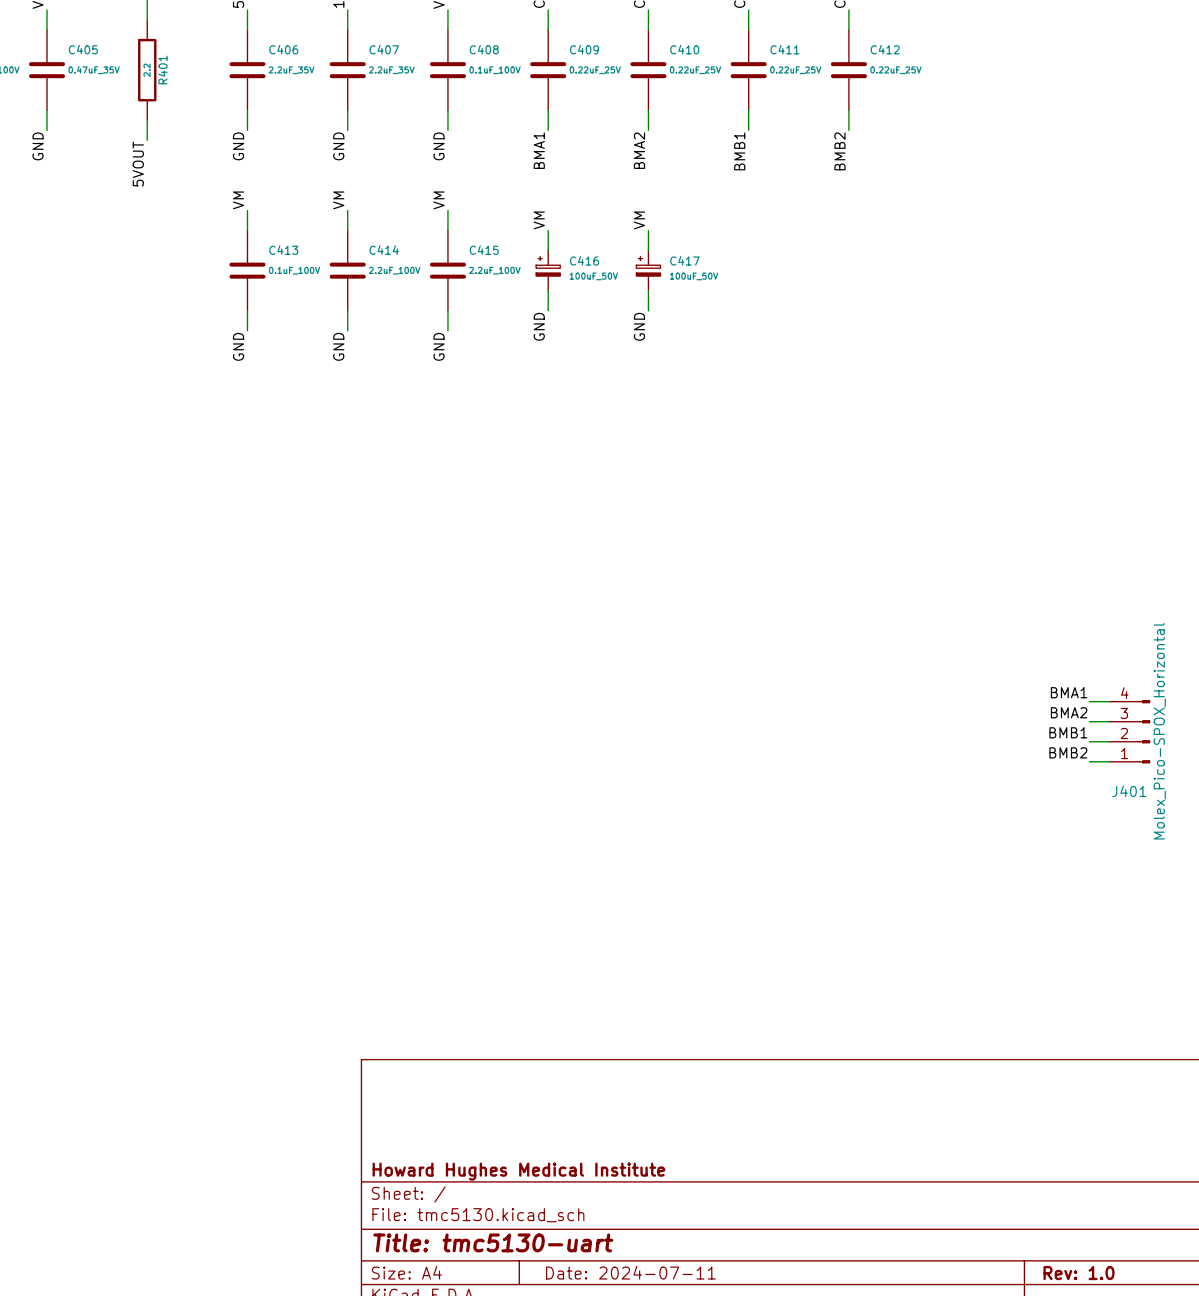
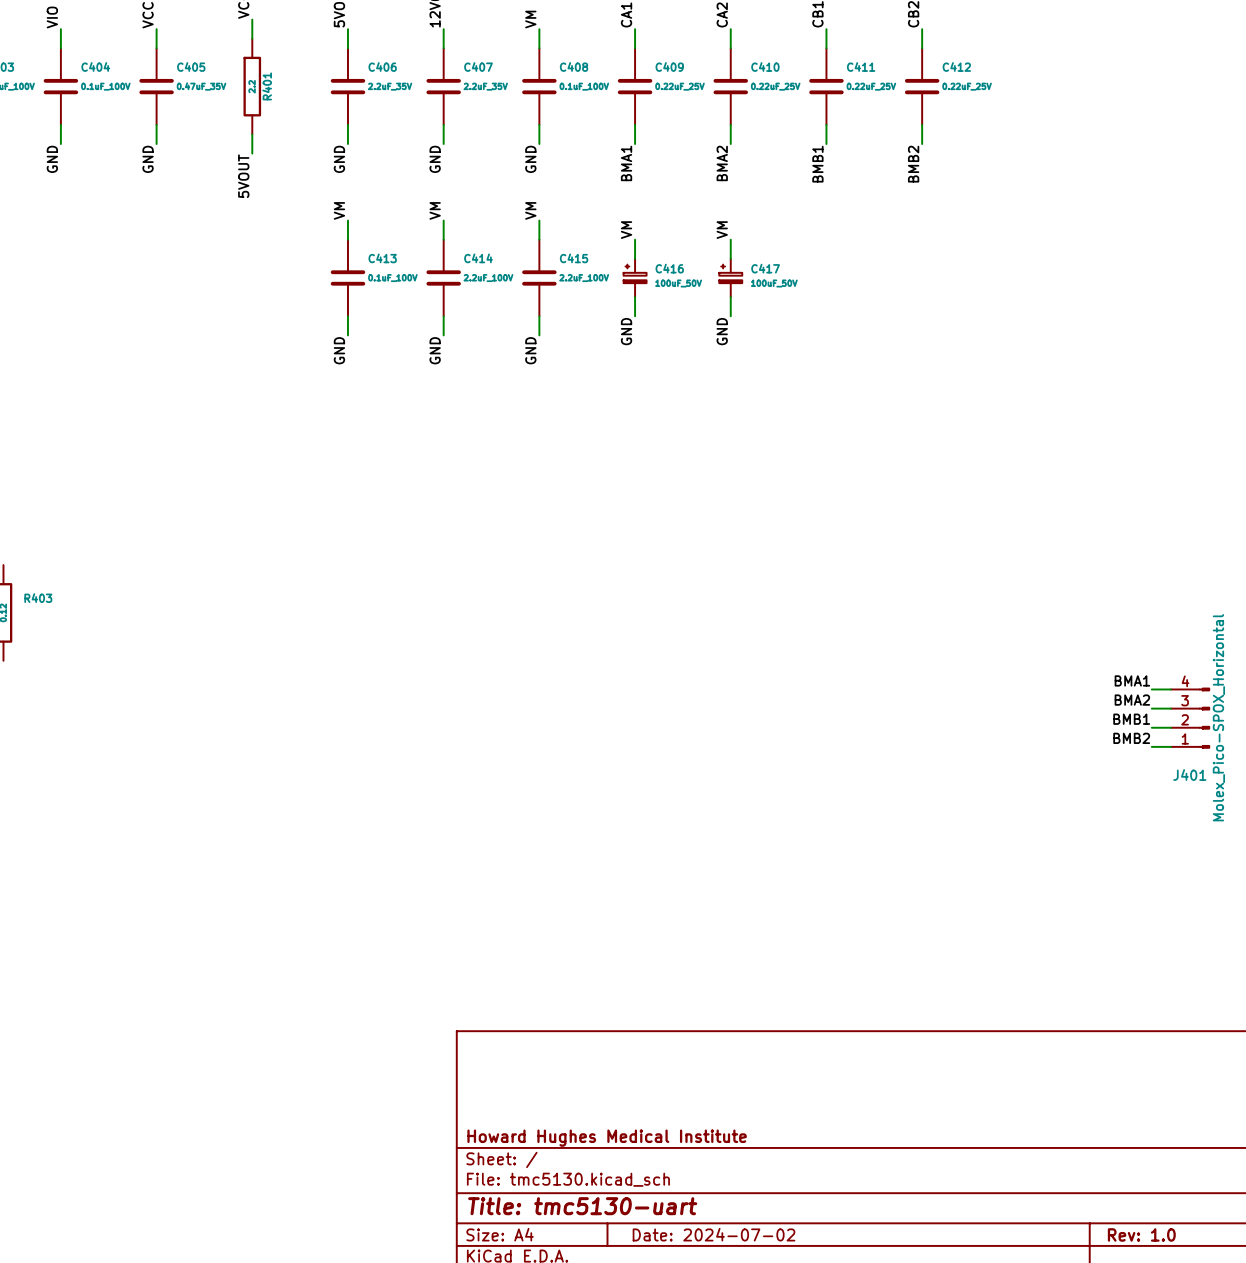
title block: Date: 2024-07-11 (630, 1272) -> Date: 2024-07-02 (714, 1234)

